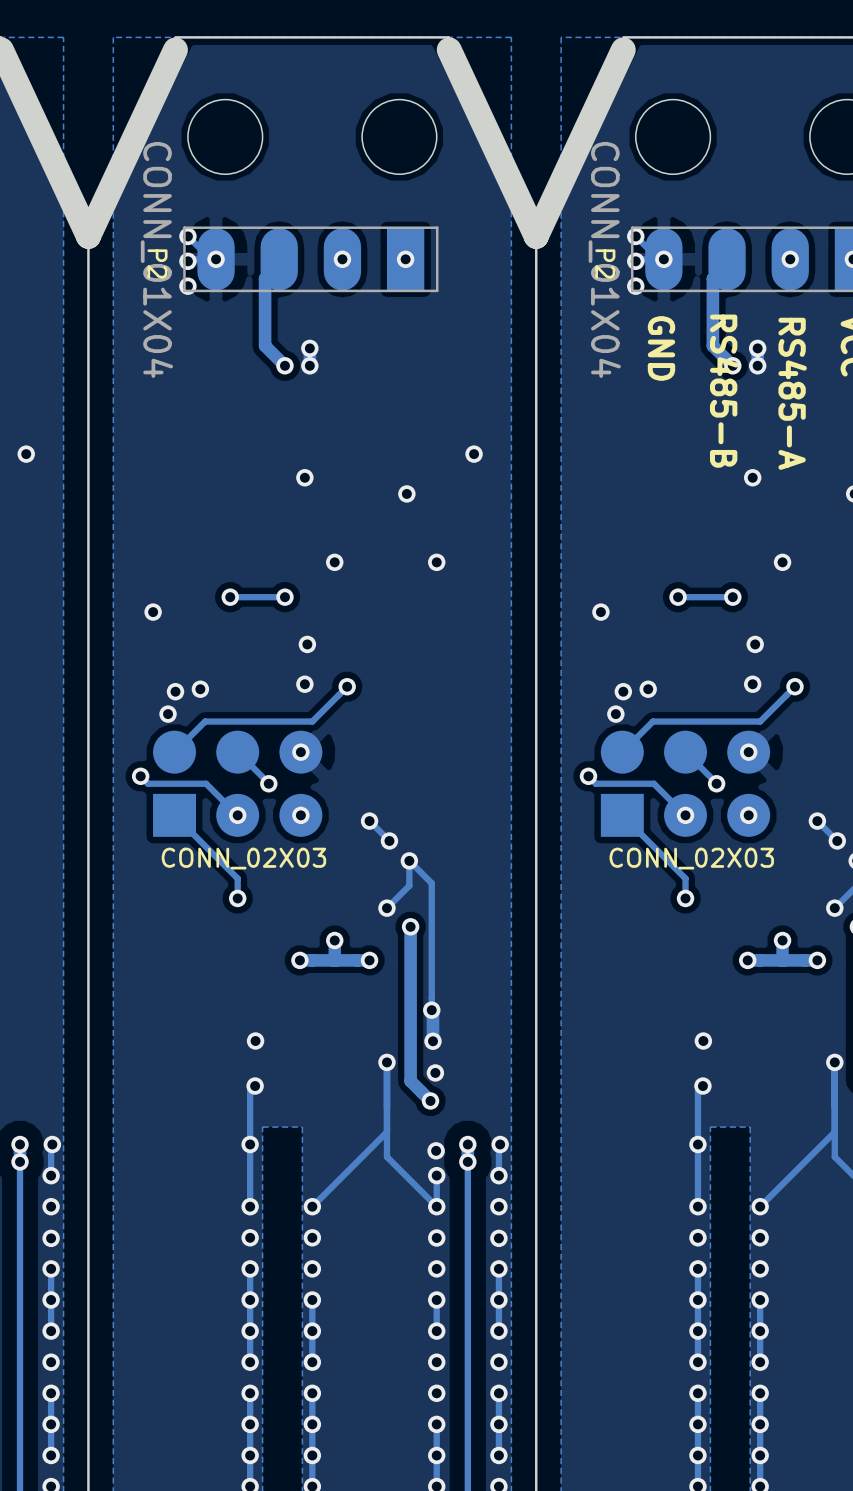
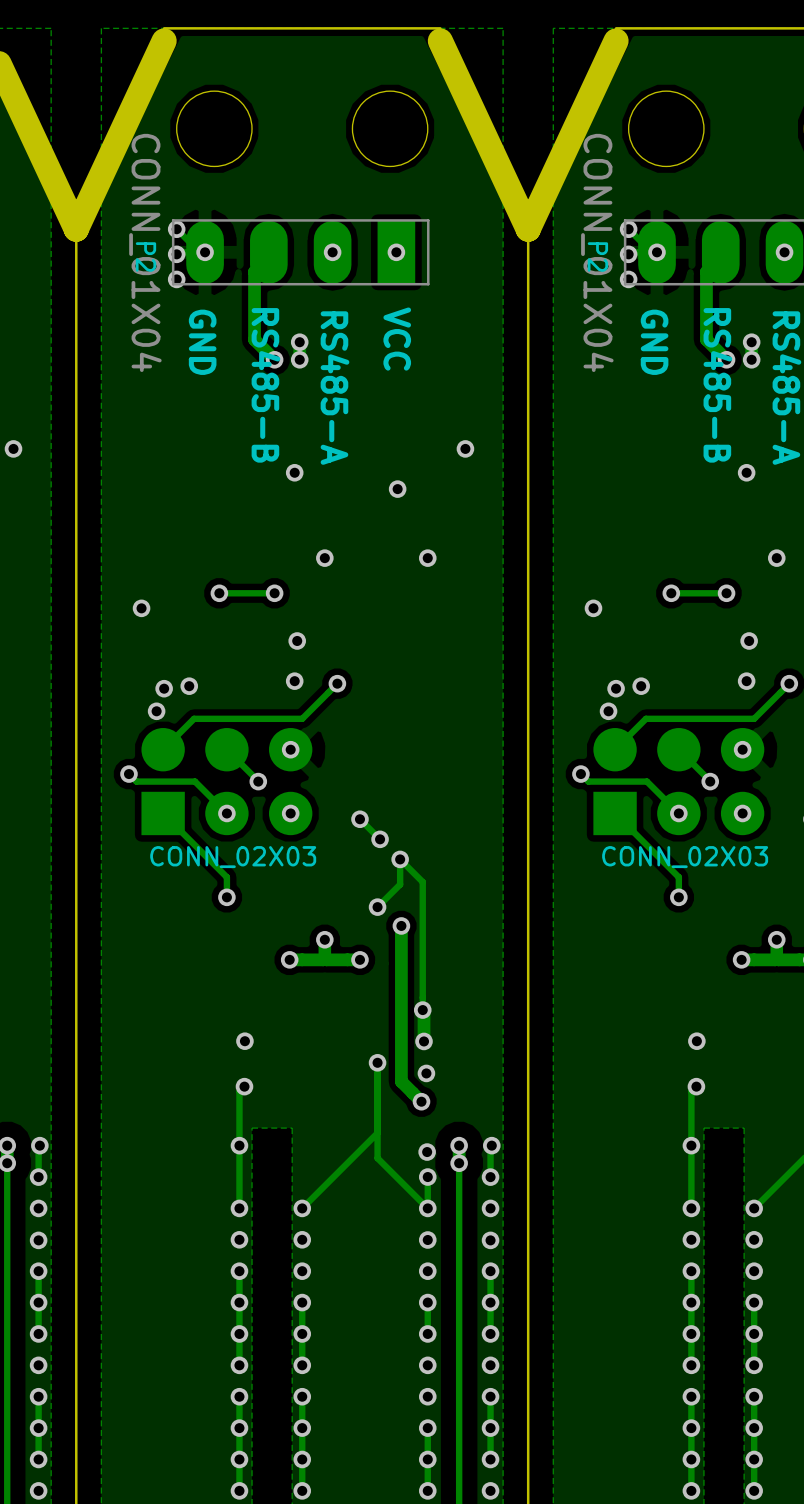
text: none -> VCC (397, 339)
text: none -> GND (202, 342)
text: none -> RS485-B (265, 385)
text: none -> RS485-A (335, 388)

